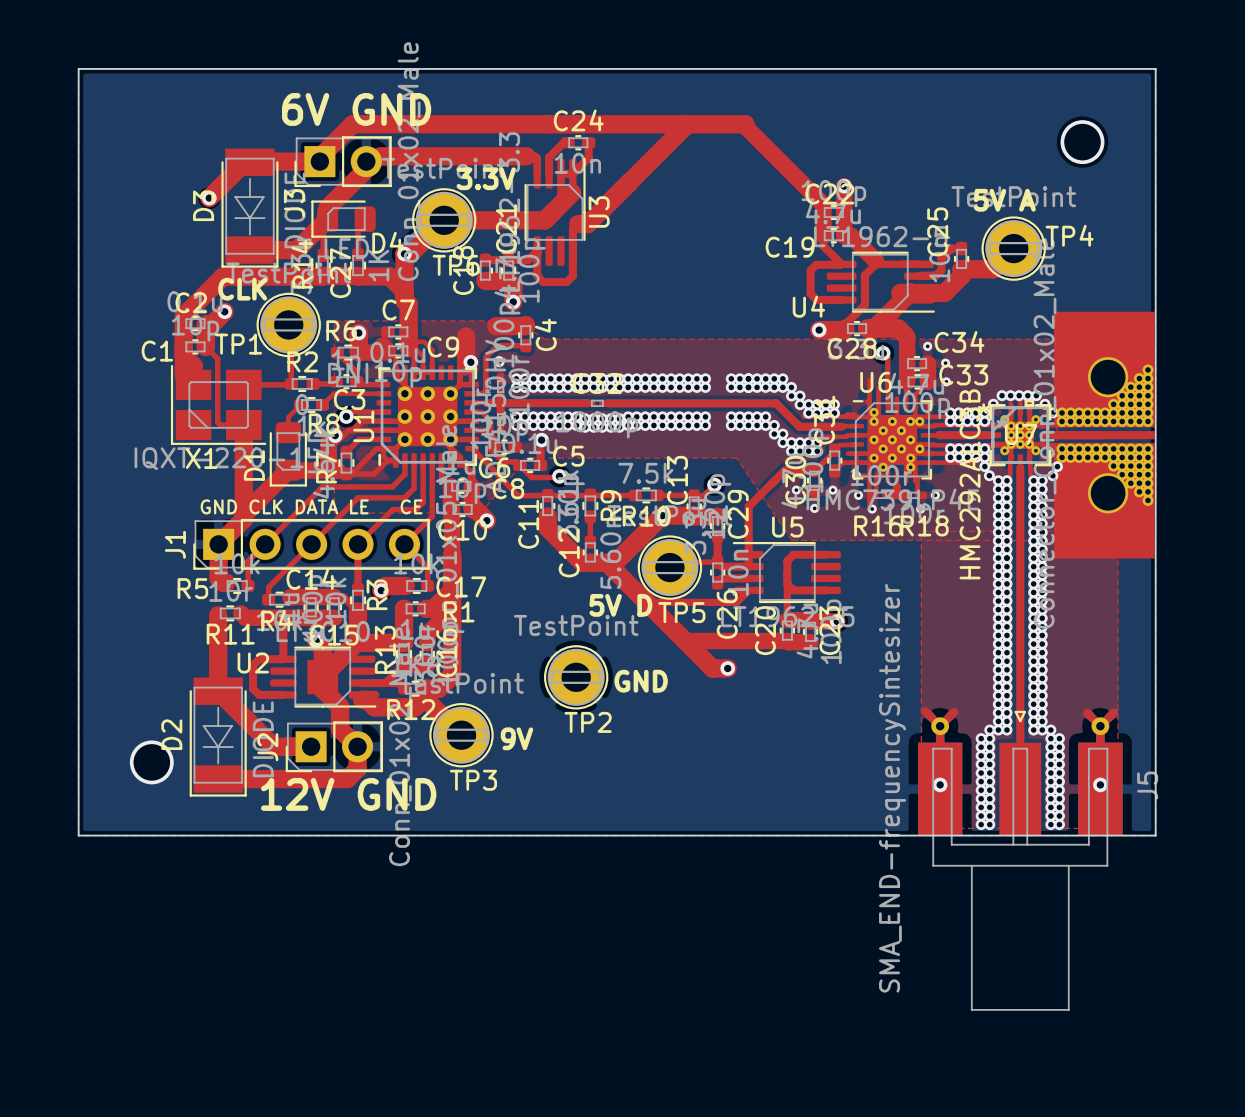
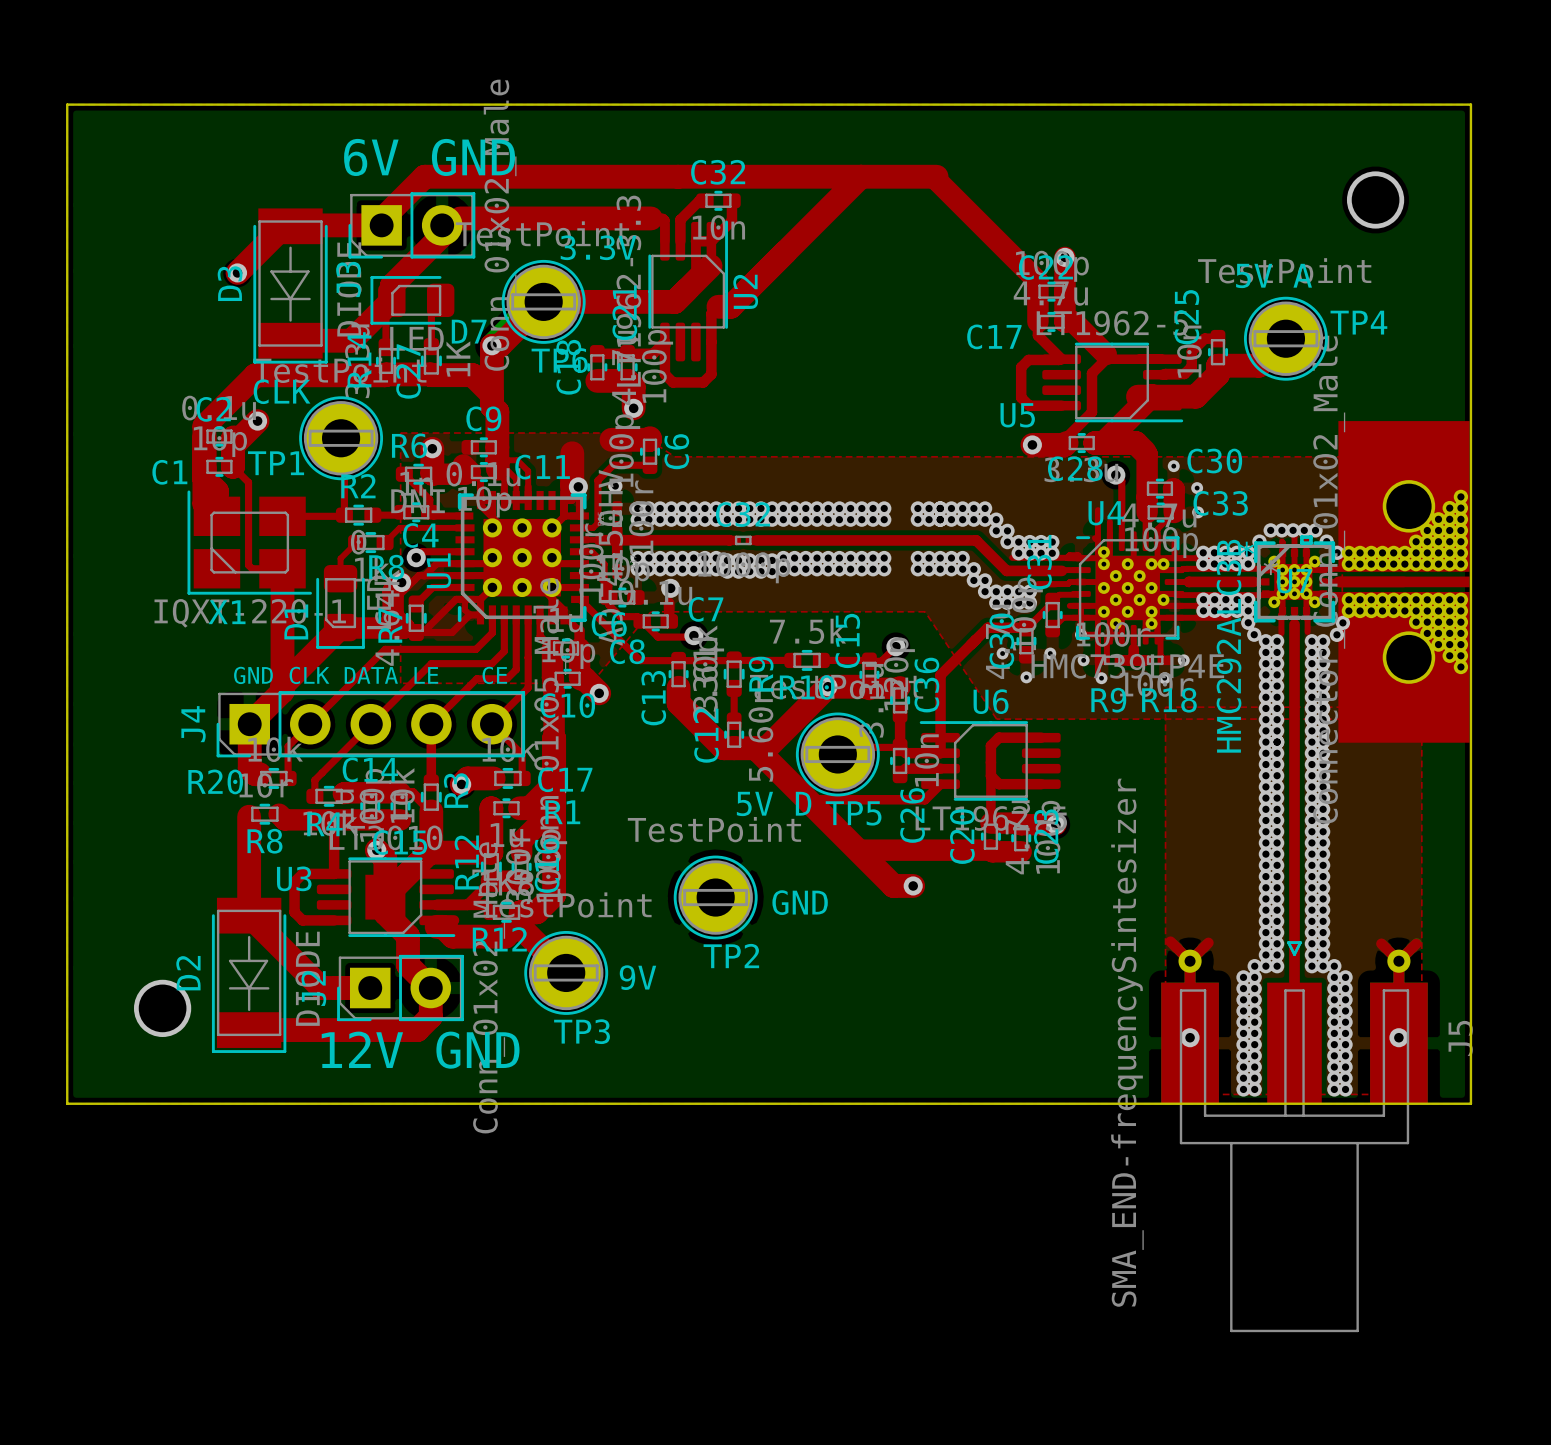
C24 name: C24 (578, 120) -> C32 (718, 172)
U3 name: U3 (599, 212) -> U2 (745, 291)
D4 name: D4 (388, 242) -> D7 (469, 331)
C19 name: C19 (790, 247) -> C17 (994, 336)
U4 name: U4 (808, 306) -> U5 (1017, 415)
C7 name: C7 (398, 310) -> C9 (483, 418)
C4 name: C4 (545, 334) -> C6 (676, 451)
C34 name: C34 (959, 341) -> C30 (1214, 461)
C9 name: C9 (443, 347) -> C11 (542, 467)
U6 name: U6 (875, 382) -> U4 (1106, 513)
C3 name: C3 (349, 399) -> C4 (420, 535)
C5 name: C5 (568, 456) -> C7 (705, 609)
C13 name: C13 (677, 480) -> C15 (847, 640)
C29 name: C29 (738, 514) -> C36 (926, 685)
C11 name: C11 (528, 524) -> C13 (653, 698)
R16 name: R16 (878, 525) -> R9 (1108, 700)
U5 name: U5 (787, 527) -> U6 (991, 701)
J1 name: J1 (175, 544) -> J4 (193, 724)
R5 name: R5 (192, 588) -> R20 (215, 781)
R11 name: R11 (230, 634) -> R8 (264, 841)
R13 name: R13 (385, 649) -> R12 (466, 862)
U2 name: U2 (253, 662) -> U3 (294, 878)

